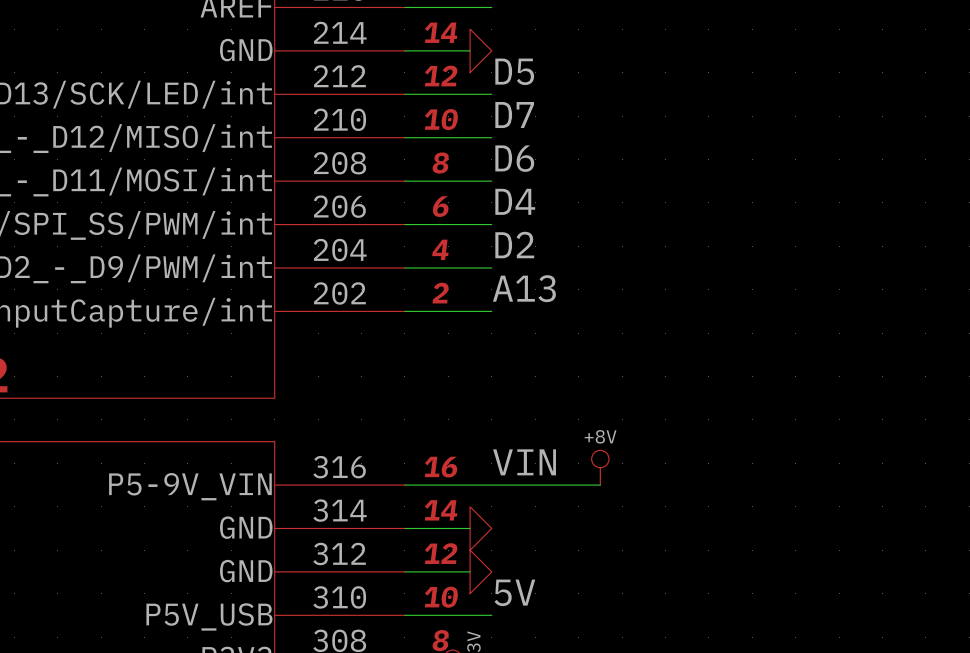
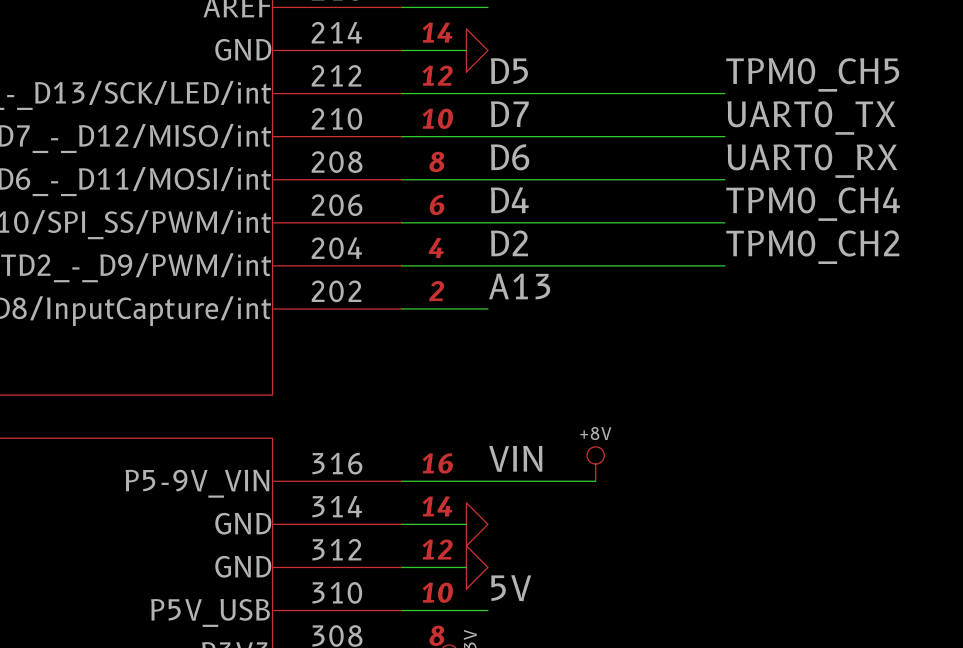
label: none -> TPM0_CH5 (812, 74)
wire: none -> (487, 93) (724, 93)
label: none -> UART0_TX (811, 117)
wire: none -> (487, 136) (724, 136)
label: none -> UART0_RX (812, 161)
wire: none -> (487, 179) (724, 179)
label: none -> TPM0_CH4 (813, 204)
wire: none -> (487, 222) (724, 222)
label: none -> TPM0_CH2 (812, 247)
wire: none -> (487, 265) (724, 265)

